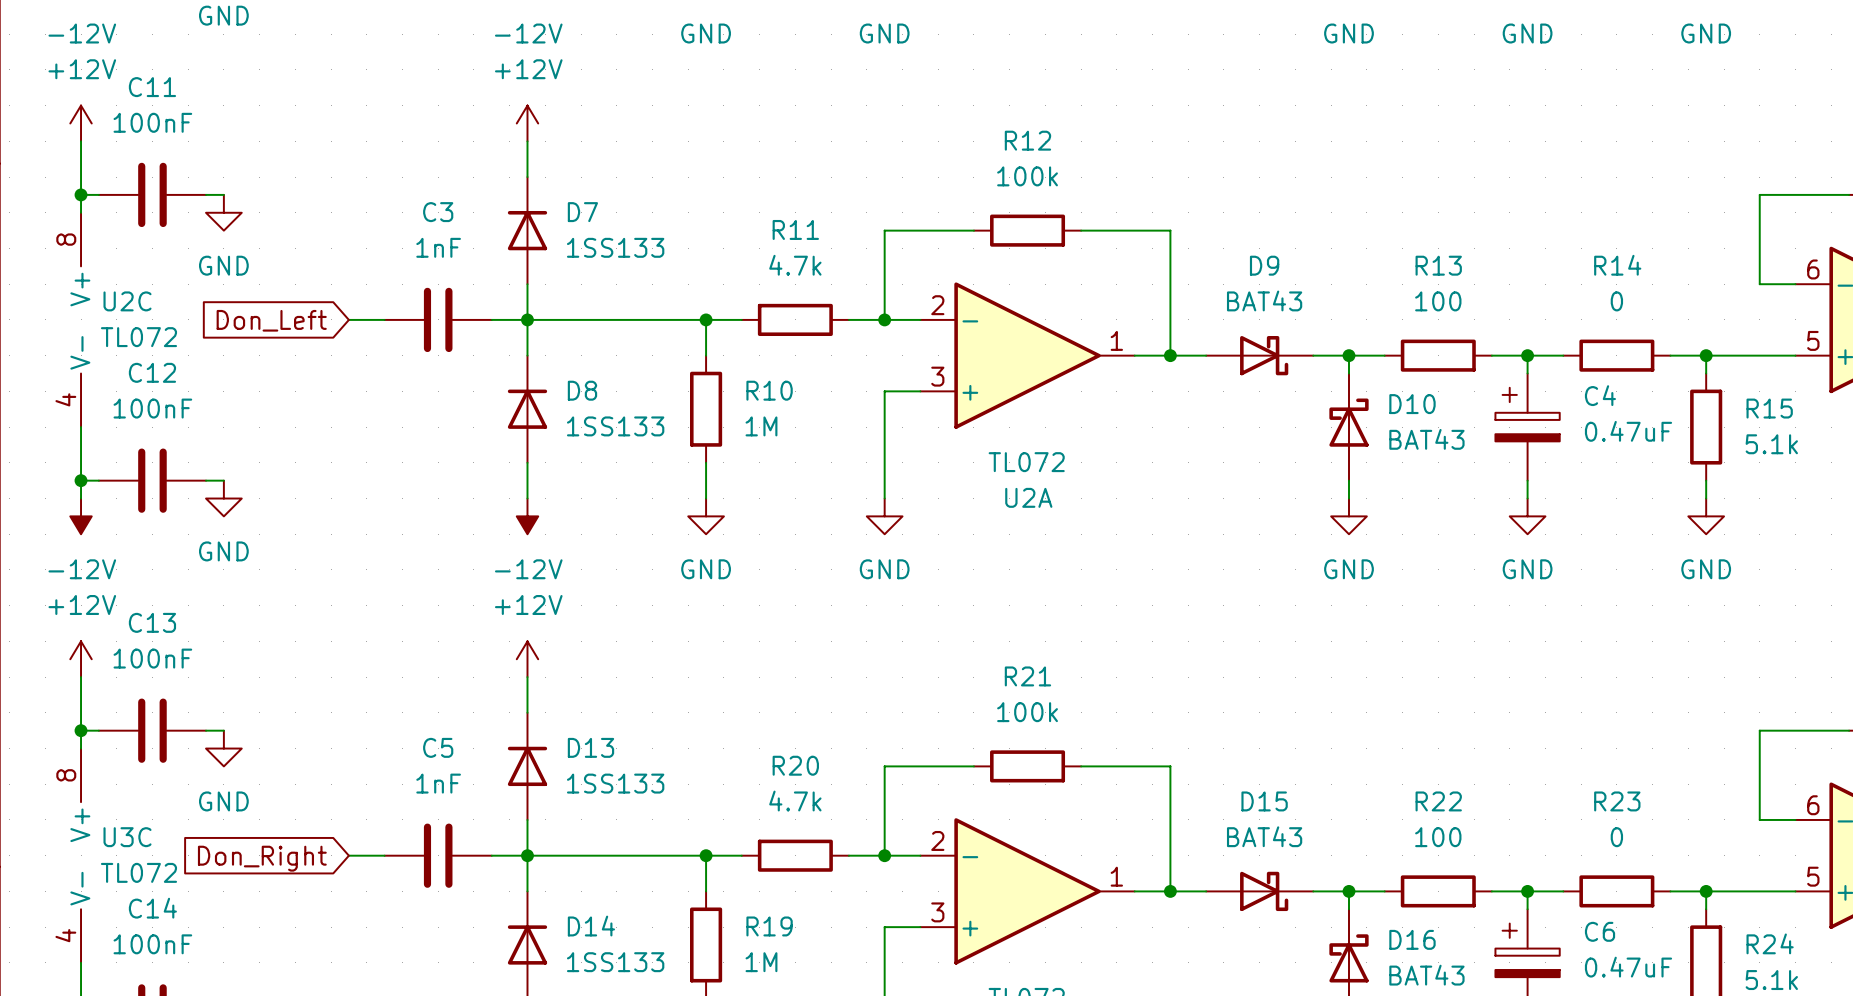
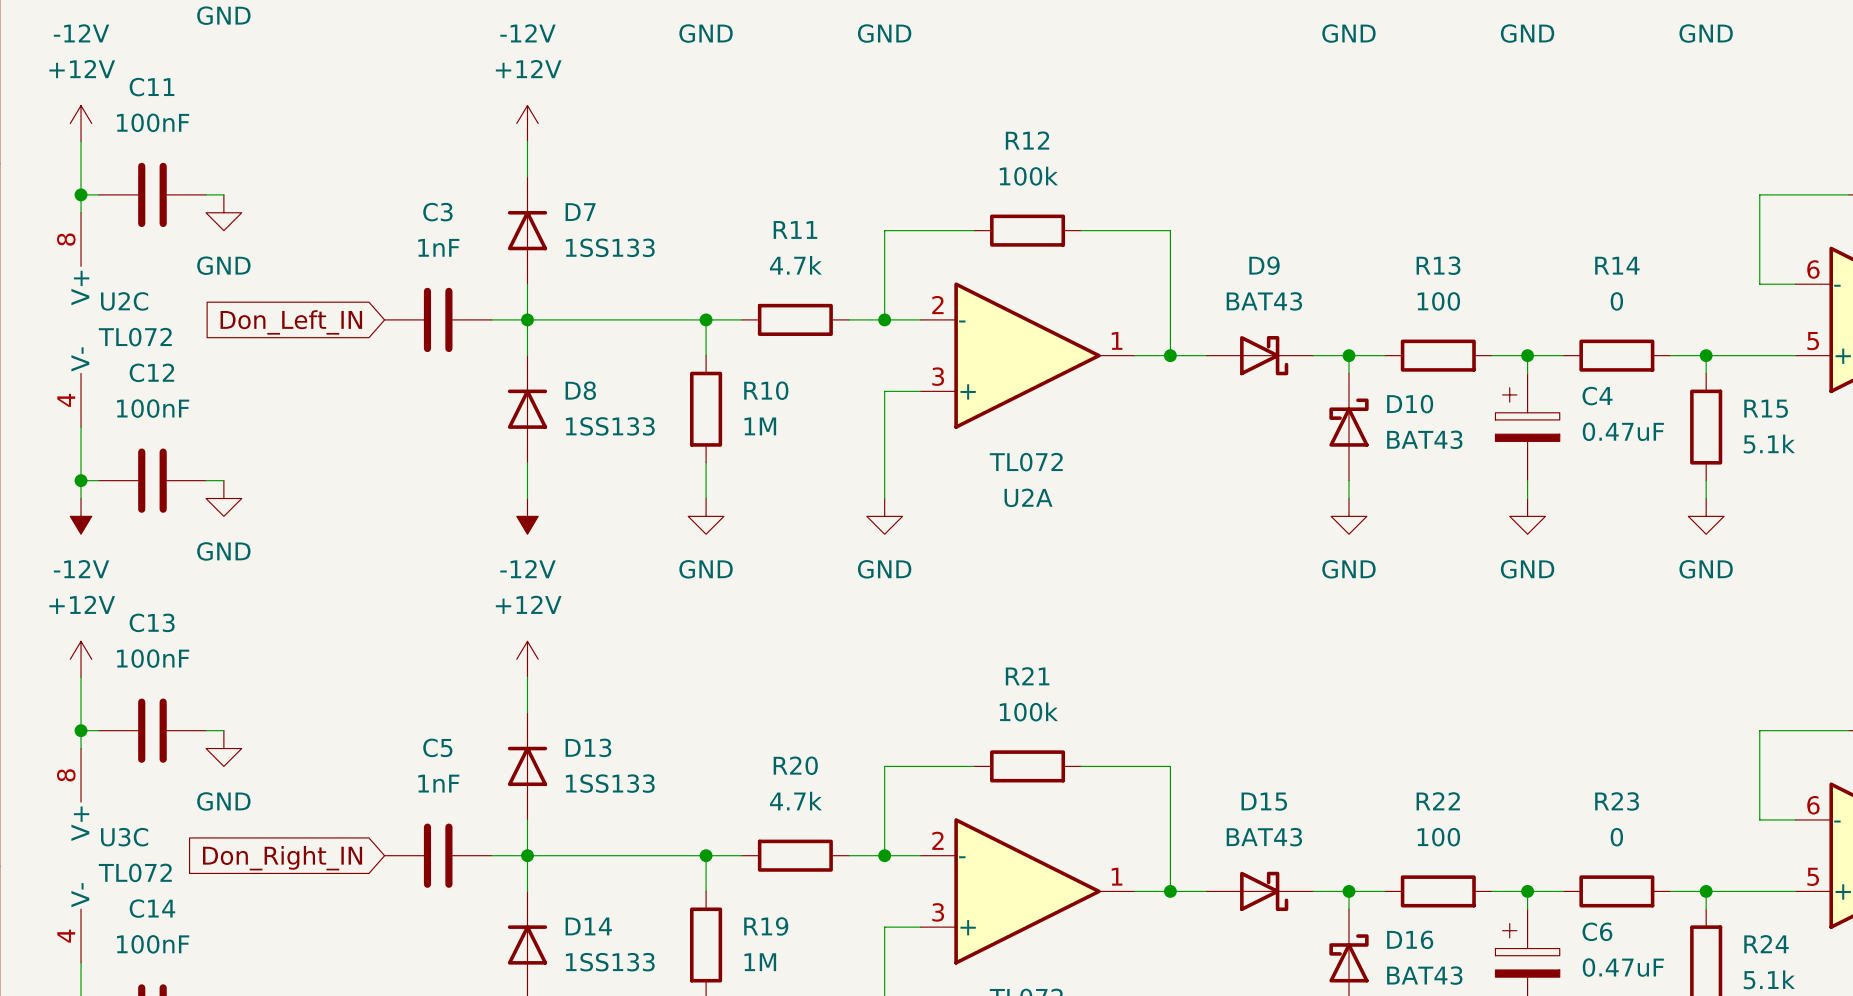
wire: (348, 319) (384, 319) -> none
global label: Don_Left (271, 320) -> Don_Left_IN (291, 322)
wire: (348, 855) (384, 855) -> none
global label: Don_Right (262, 858) -> Don_Right_IN (282, 858)

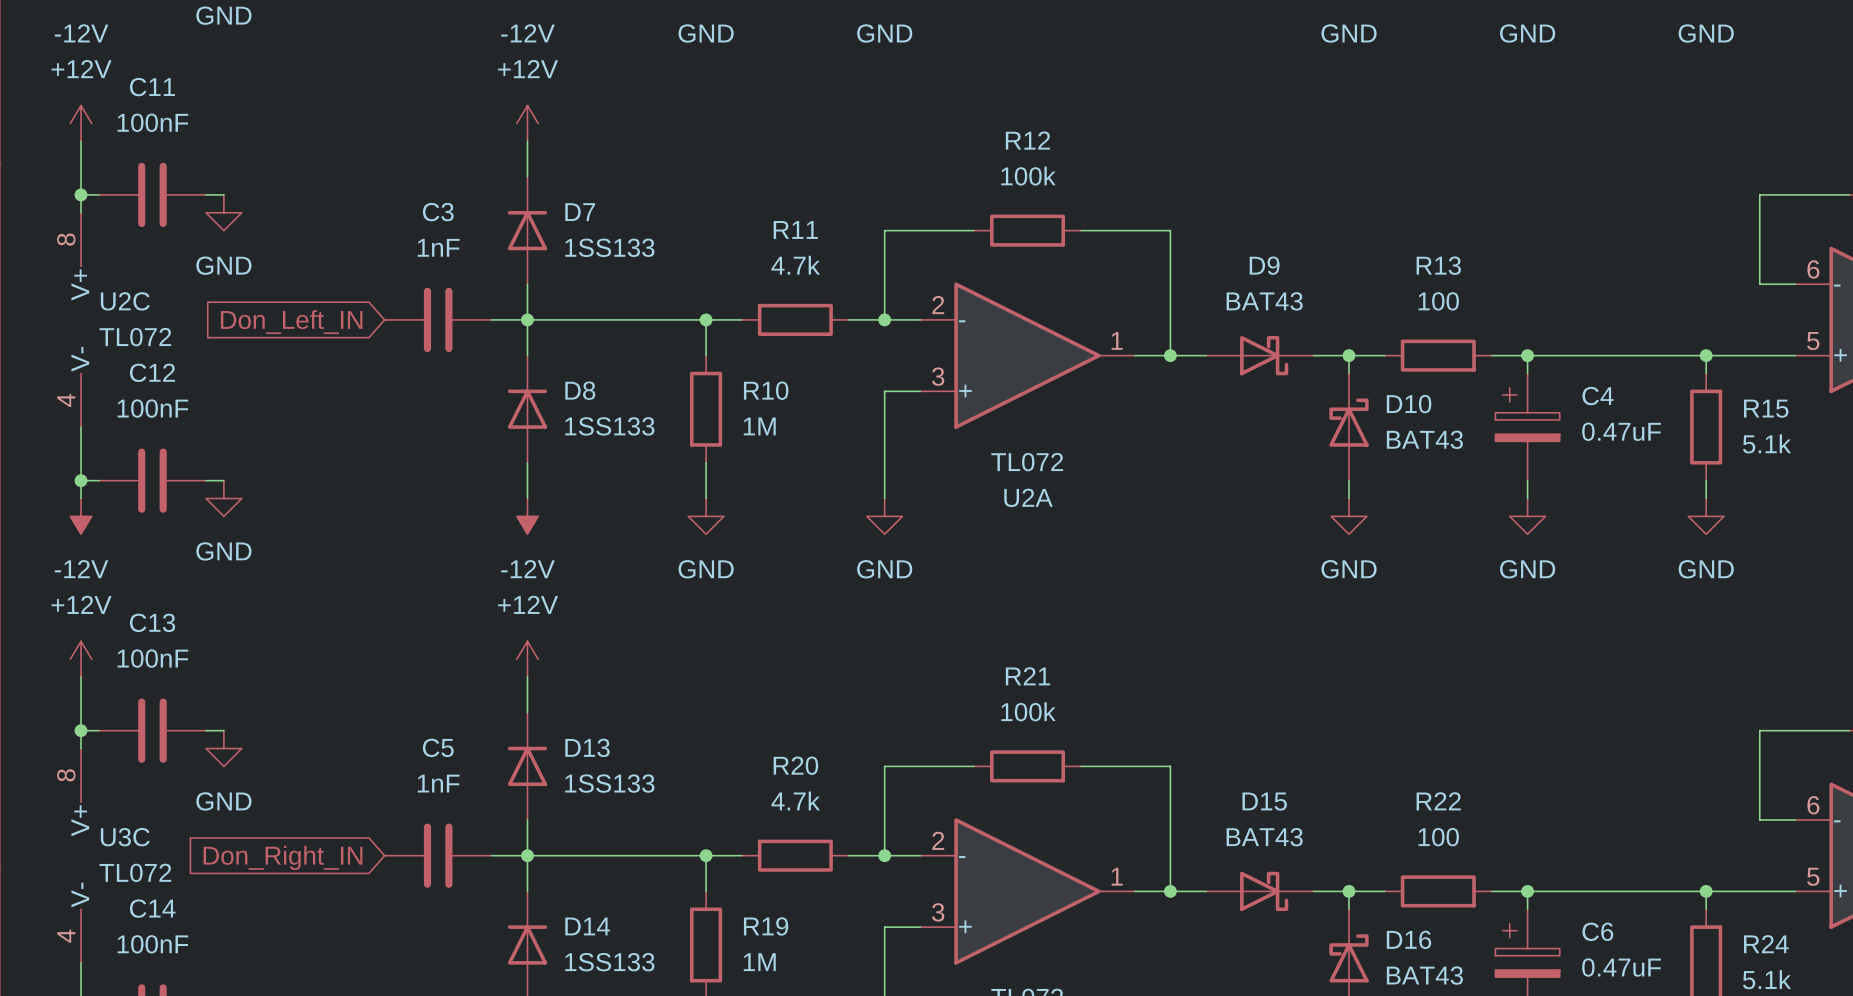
wire: none -> (1563, 355) (1670, 355)
R14: 0 (1616, 355) -> none
wire: none -> (1563, 891) (1670, 891)
R23: 0 (1616, 891) -> none

